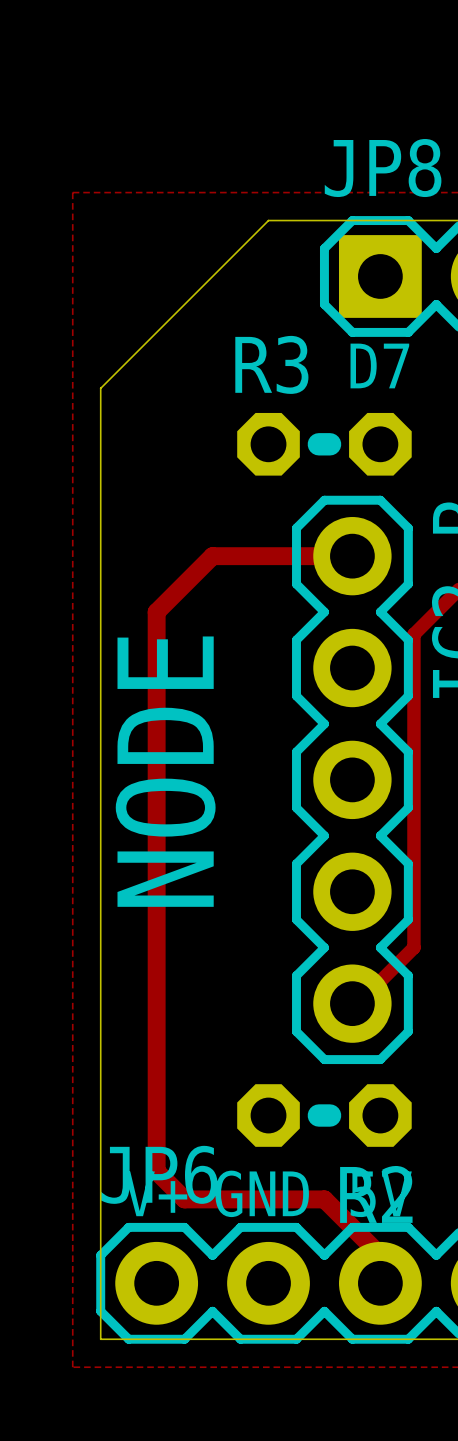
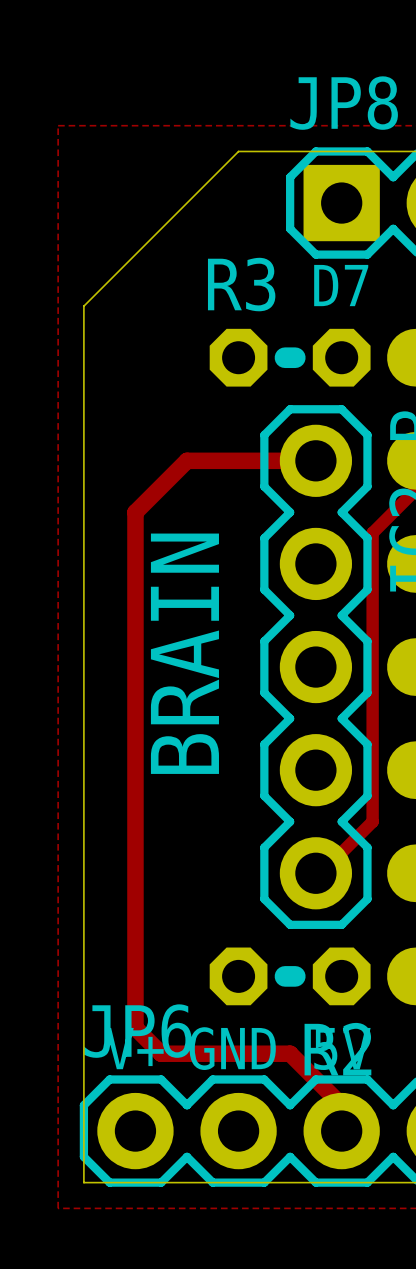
text: none -> BRAIN (184, 653)
text: NODE (165, 771) -> none

